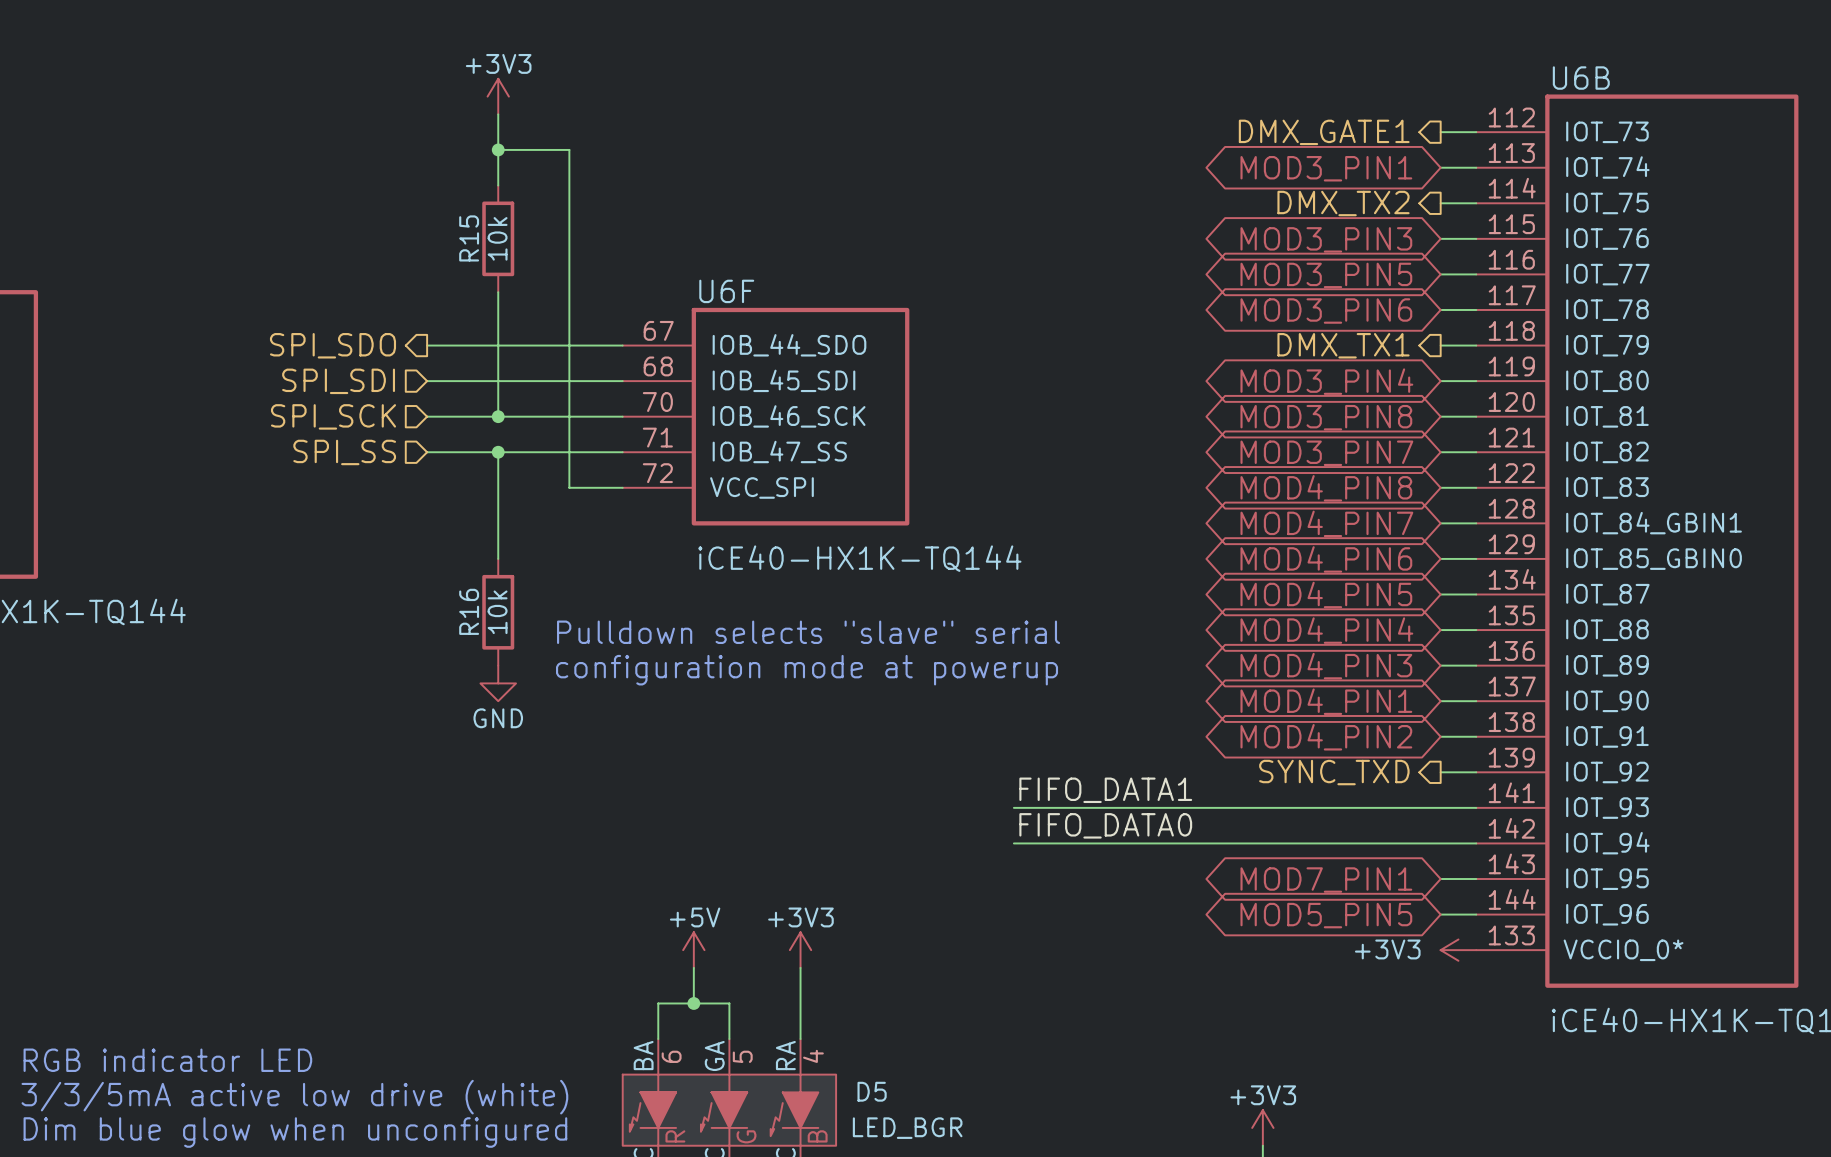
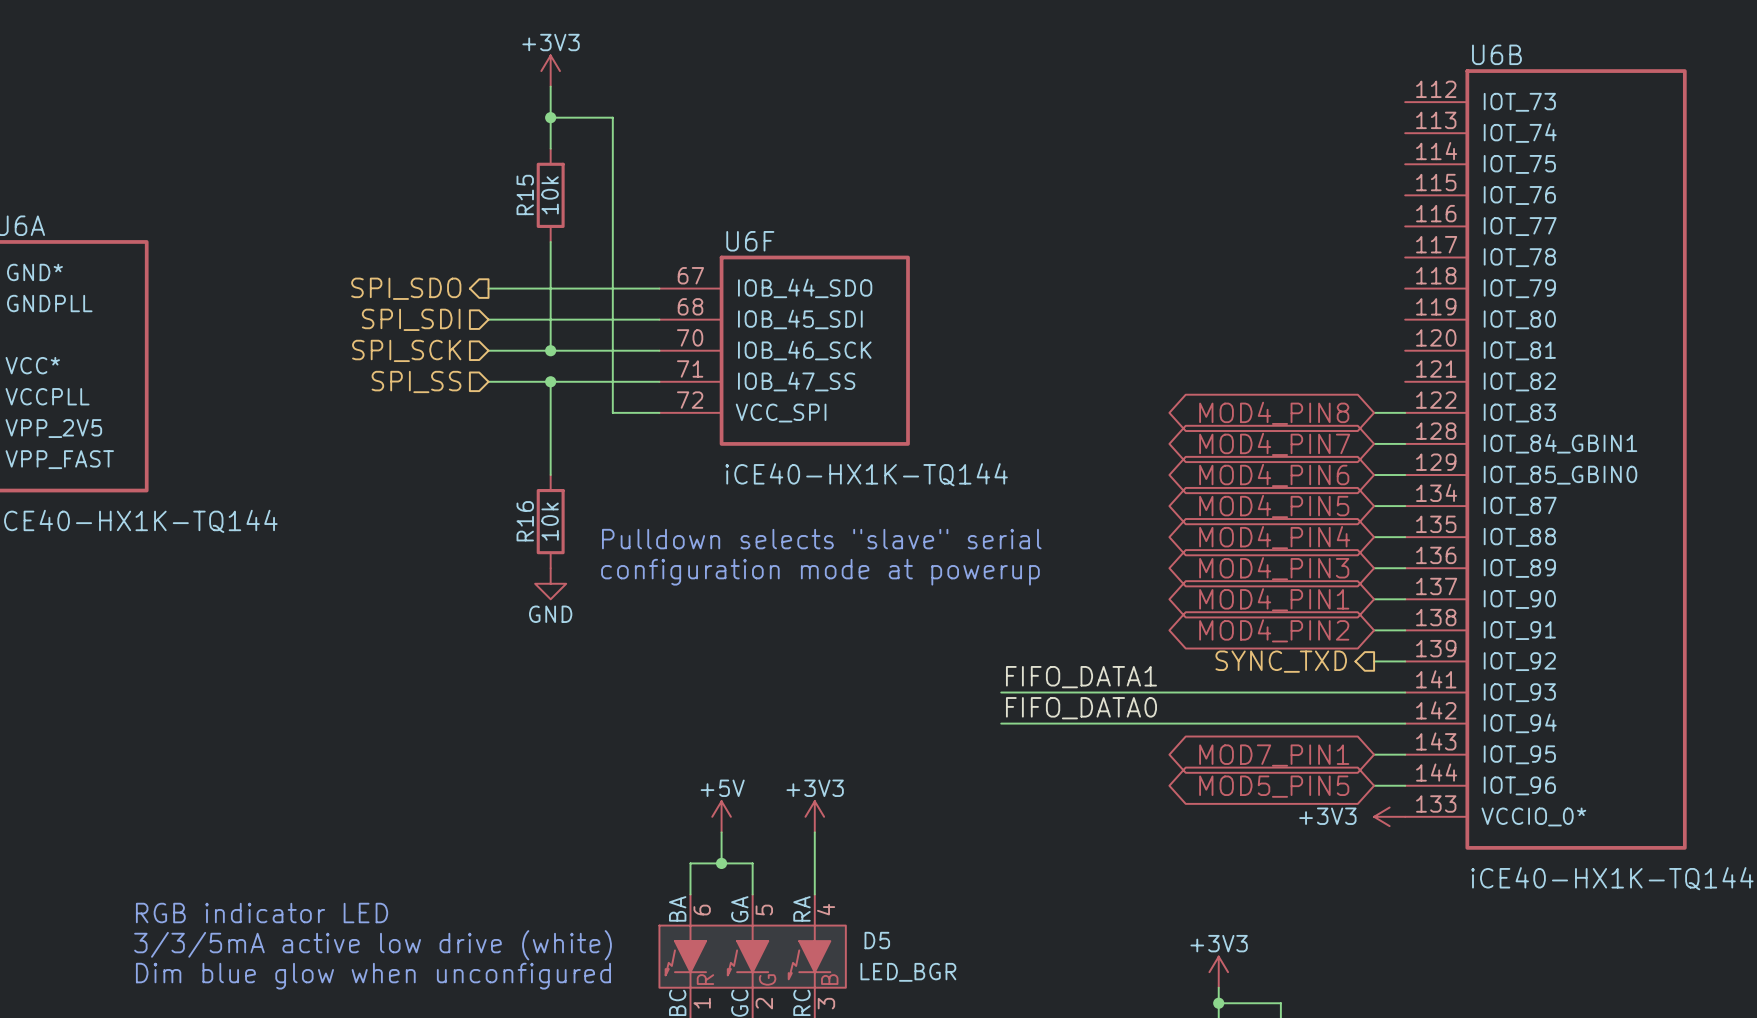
hierarchical label: DMX_GATE1 (1324, 132) -> none
wire: (1440, 132) (1476, 132) -> none
wire: (1440, 167) (1476, 167) -> none
global label: MOD3_PIN1 (1326, 168) -> none
hierarchical label: DMX_TX2 (1343, 203) -> none
wire: (1440, 203) (1476, 203) -> none
wire: (1440, 238) (1476, 238) -> none
global label: MOD3_PIN3 (1326, 239) -> none
wire: (1440, 274) (1476, 274) -> none
global label: MOD3_PIN5 (1326, 275) -> none
wire: (1440, 309) (1476, 309) -> none
global label: MOD3_PIN6 (1326, 311) -> none
hierarchical label: DMX_TX1 (1343, 345) -> none
wire: (1440, 345) (1476, 345) -> none
global label: MOD3_PIN4 (1326, 381) -> none
wire: (1440, 381) (1476, 381) -> none
wire: (1440, 416) (1476, 416) -> none
global label: MOD3_PIN8 (1326, 417) -> none
wire: (1440, 452) (1476, 452) -> none
global label: MOD3_PIN7 (1326, 453) -> none

